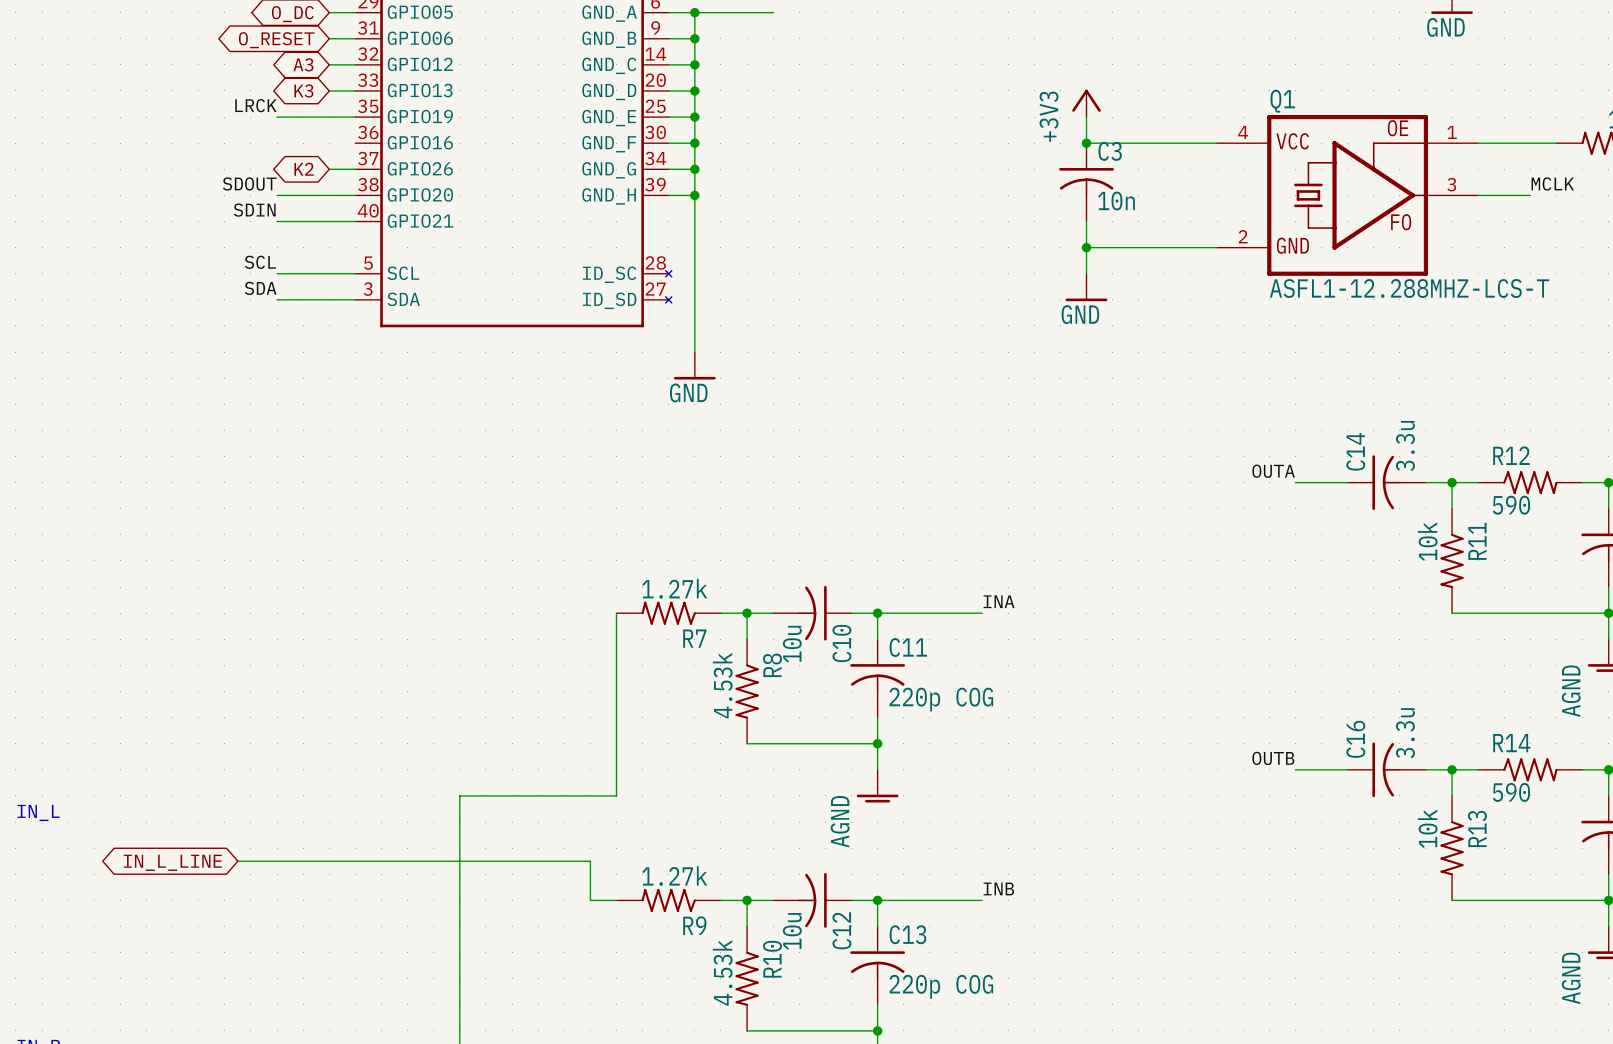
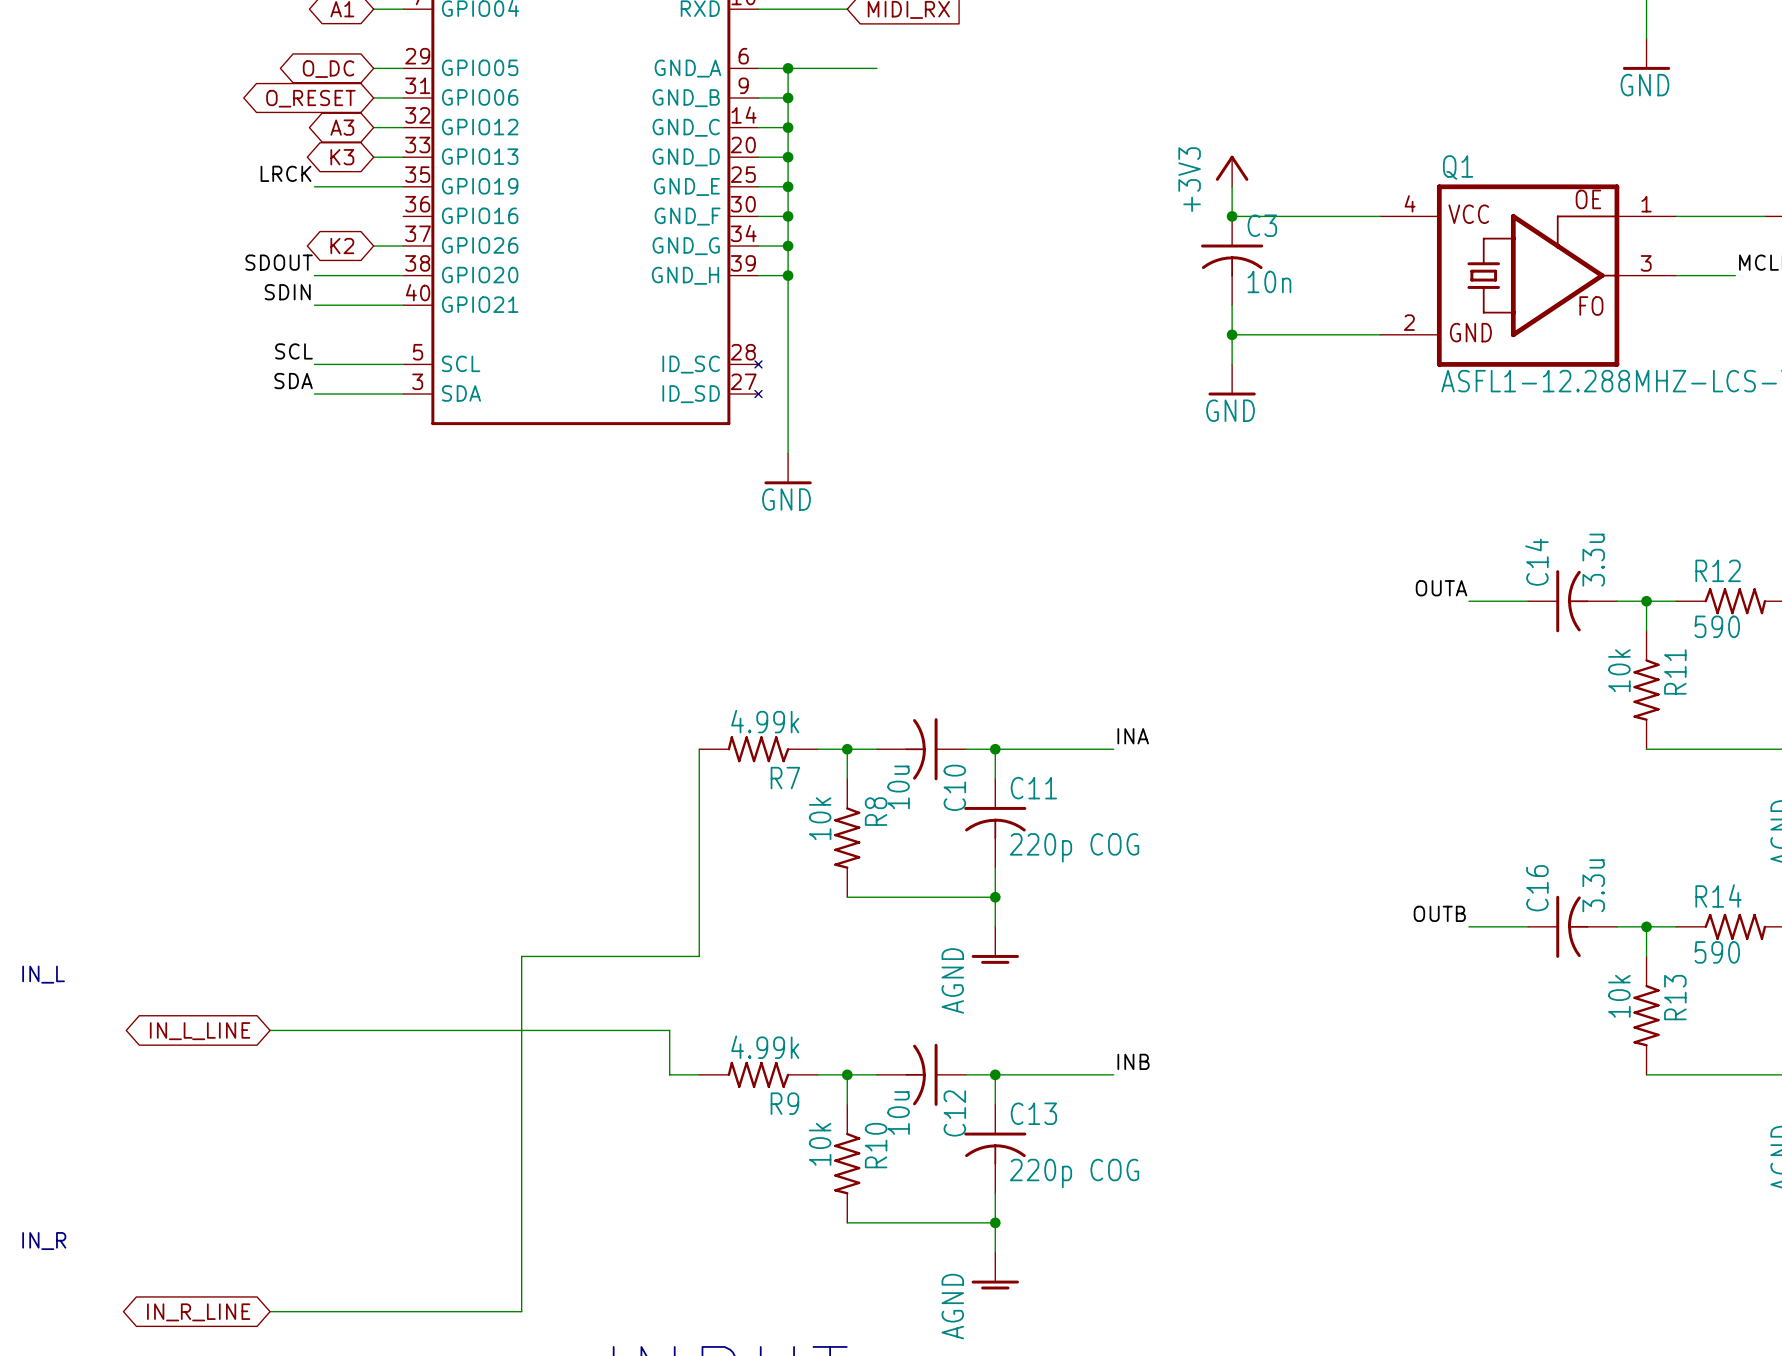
R7 value: 1.27k (674, 588) -> 4.99k (765, 721)
R8 value: 4.53k (722, 685) -> 10k (820, 818)
R9 value: 1.27k (674, 876) -> 4.99k (765, 1047)
R10 value: 4.53k (722, 972) -> 10k (820, 1144)

